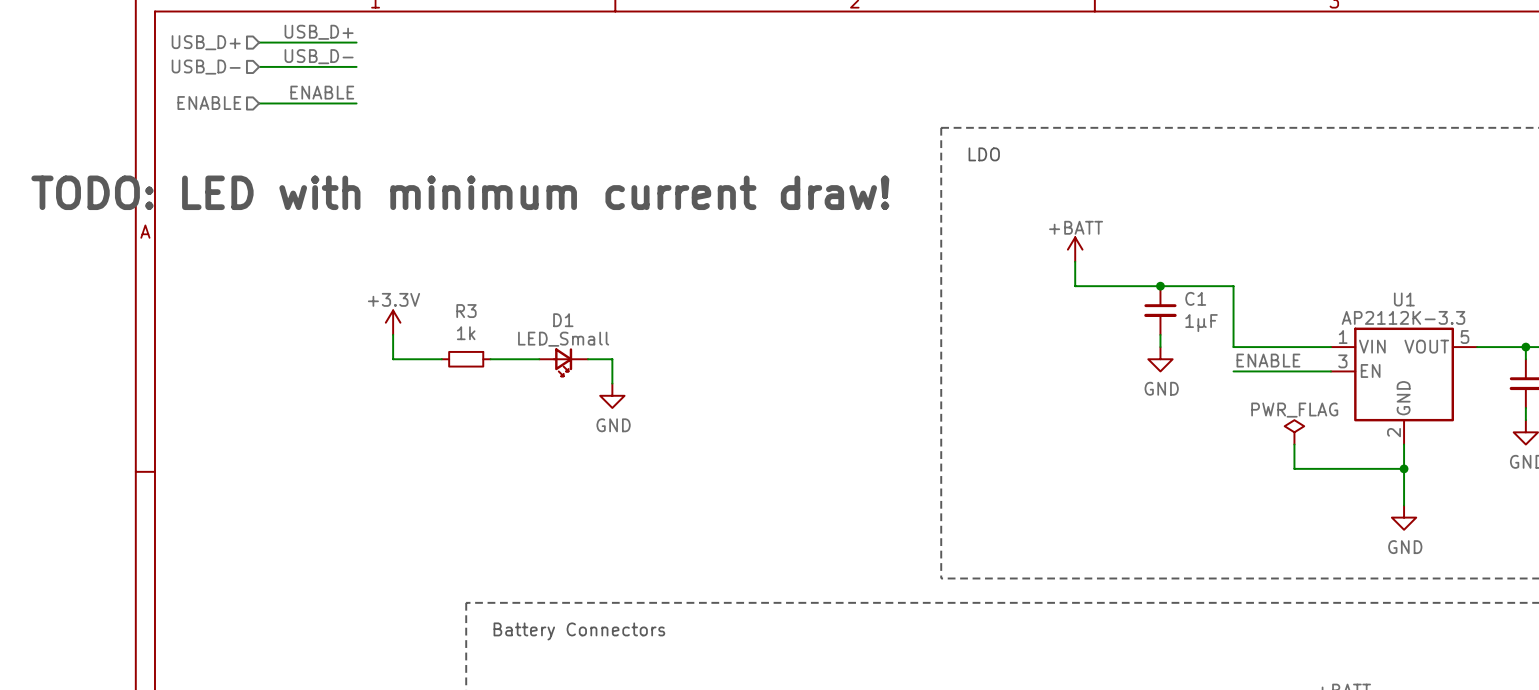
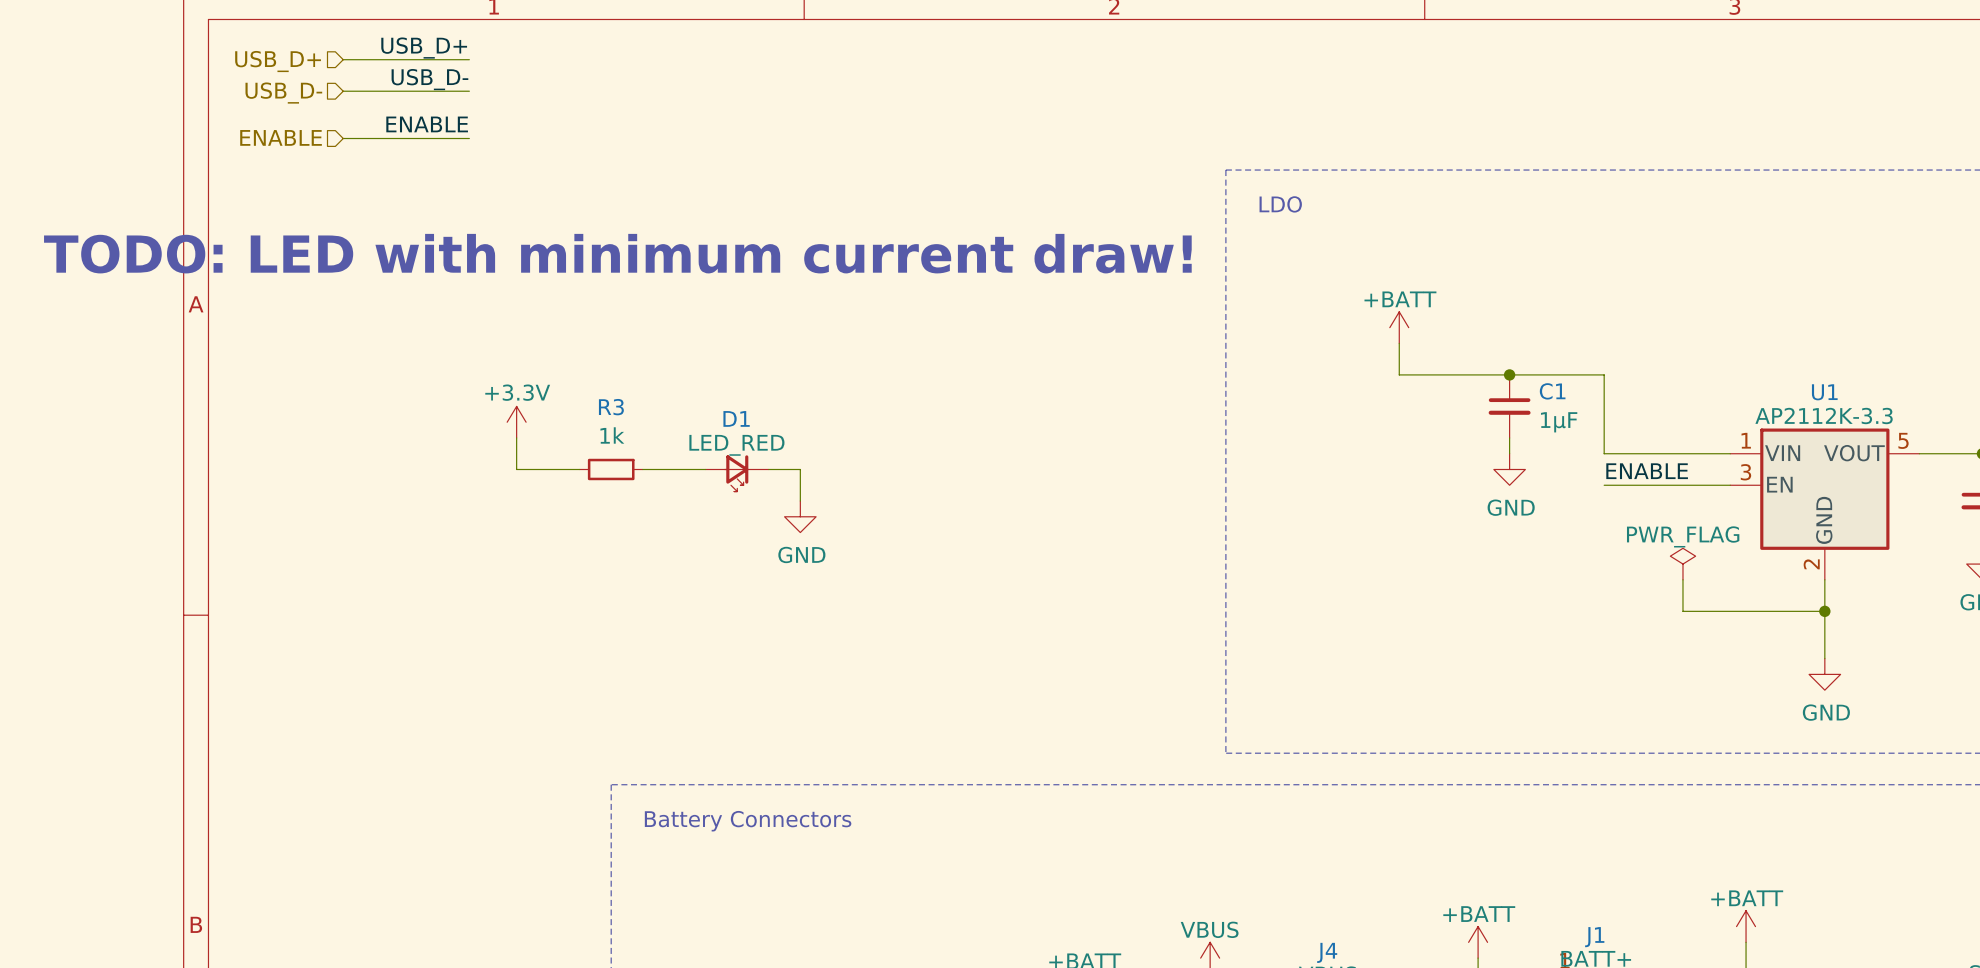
D1 value: LED_Small (563, 339) -> LED_RED (736, 445)

